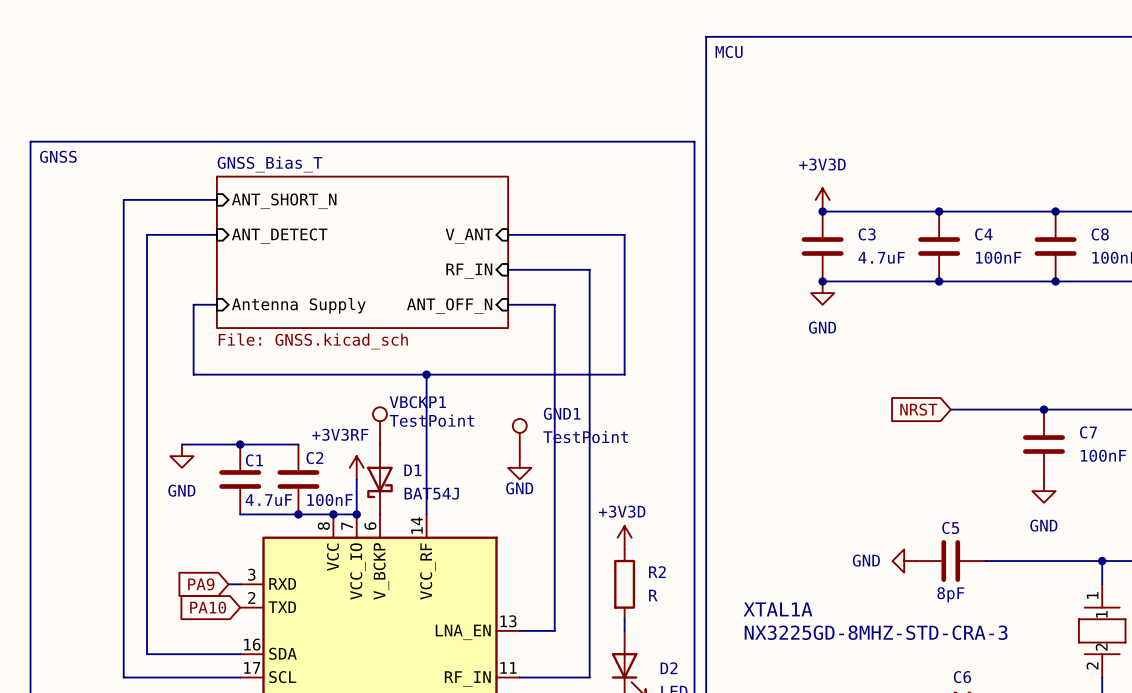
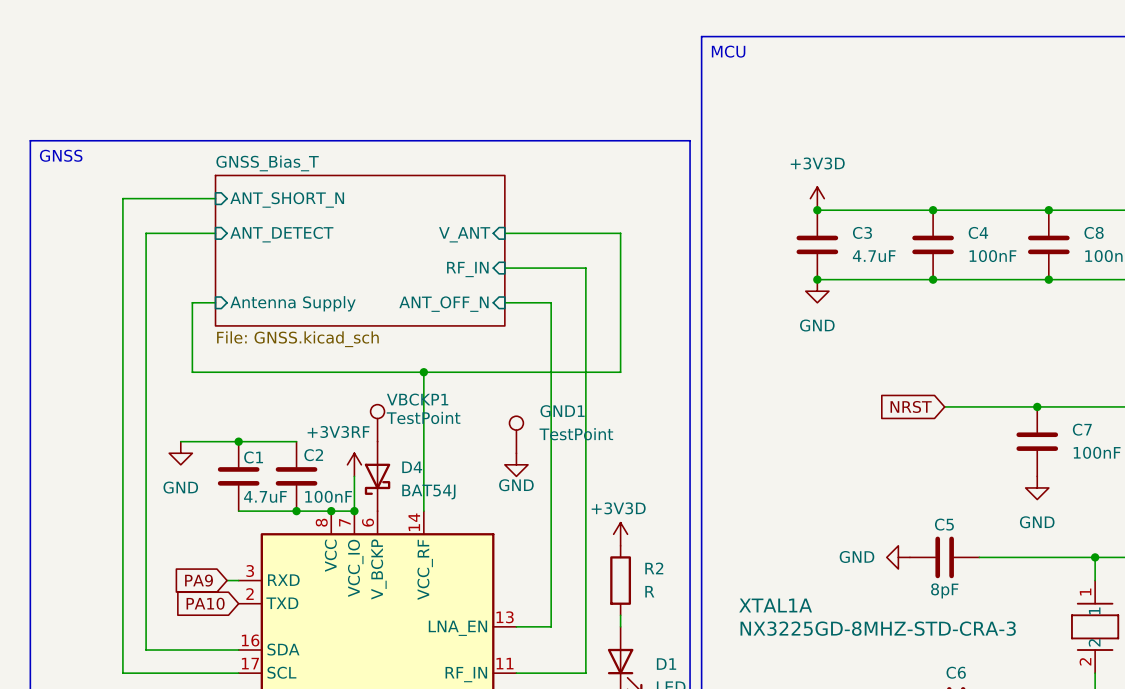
D1 name: D1 (412, 470) -> D4 (412, 467)
D2 name: D2 (669, 668) -> D1 (666, 664)

